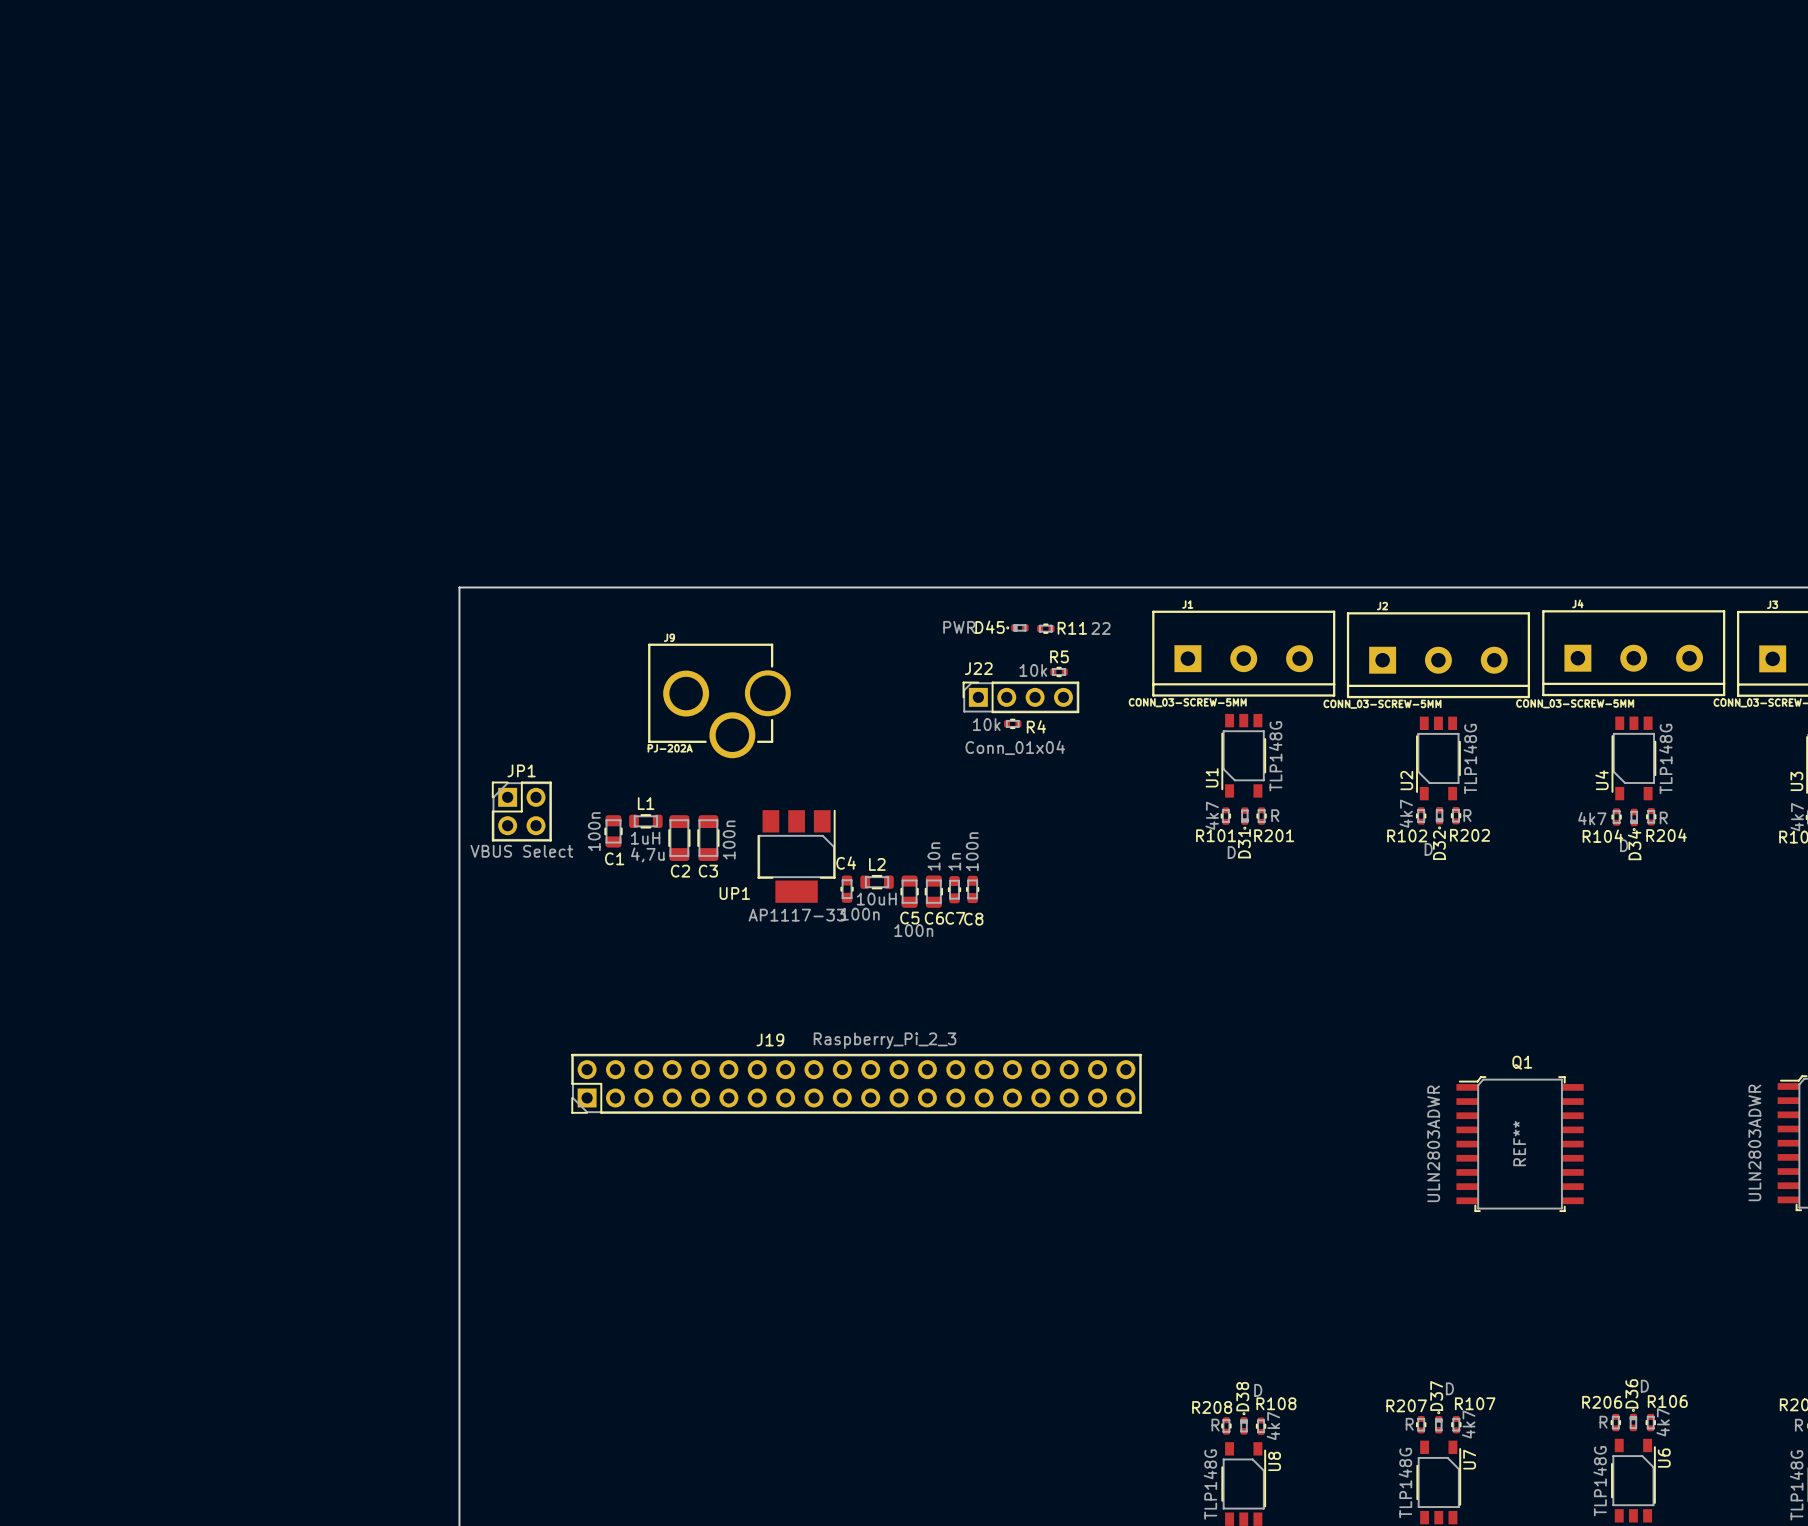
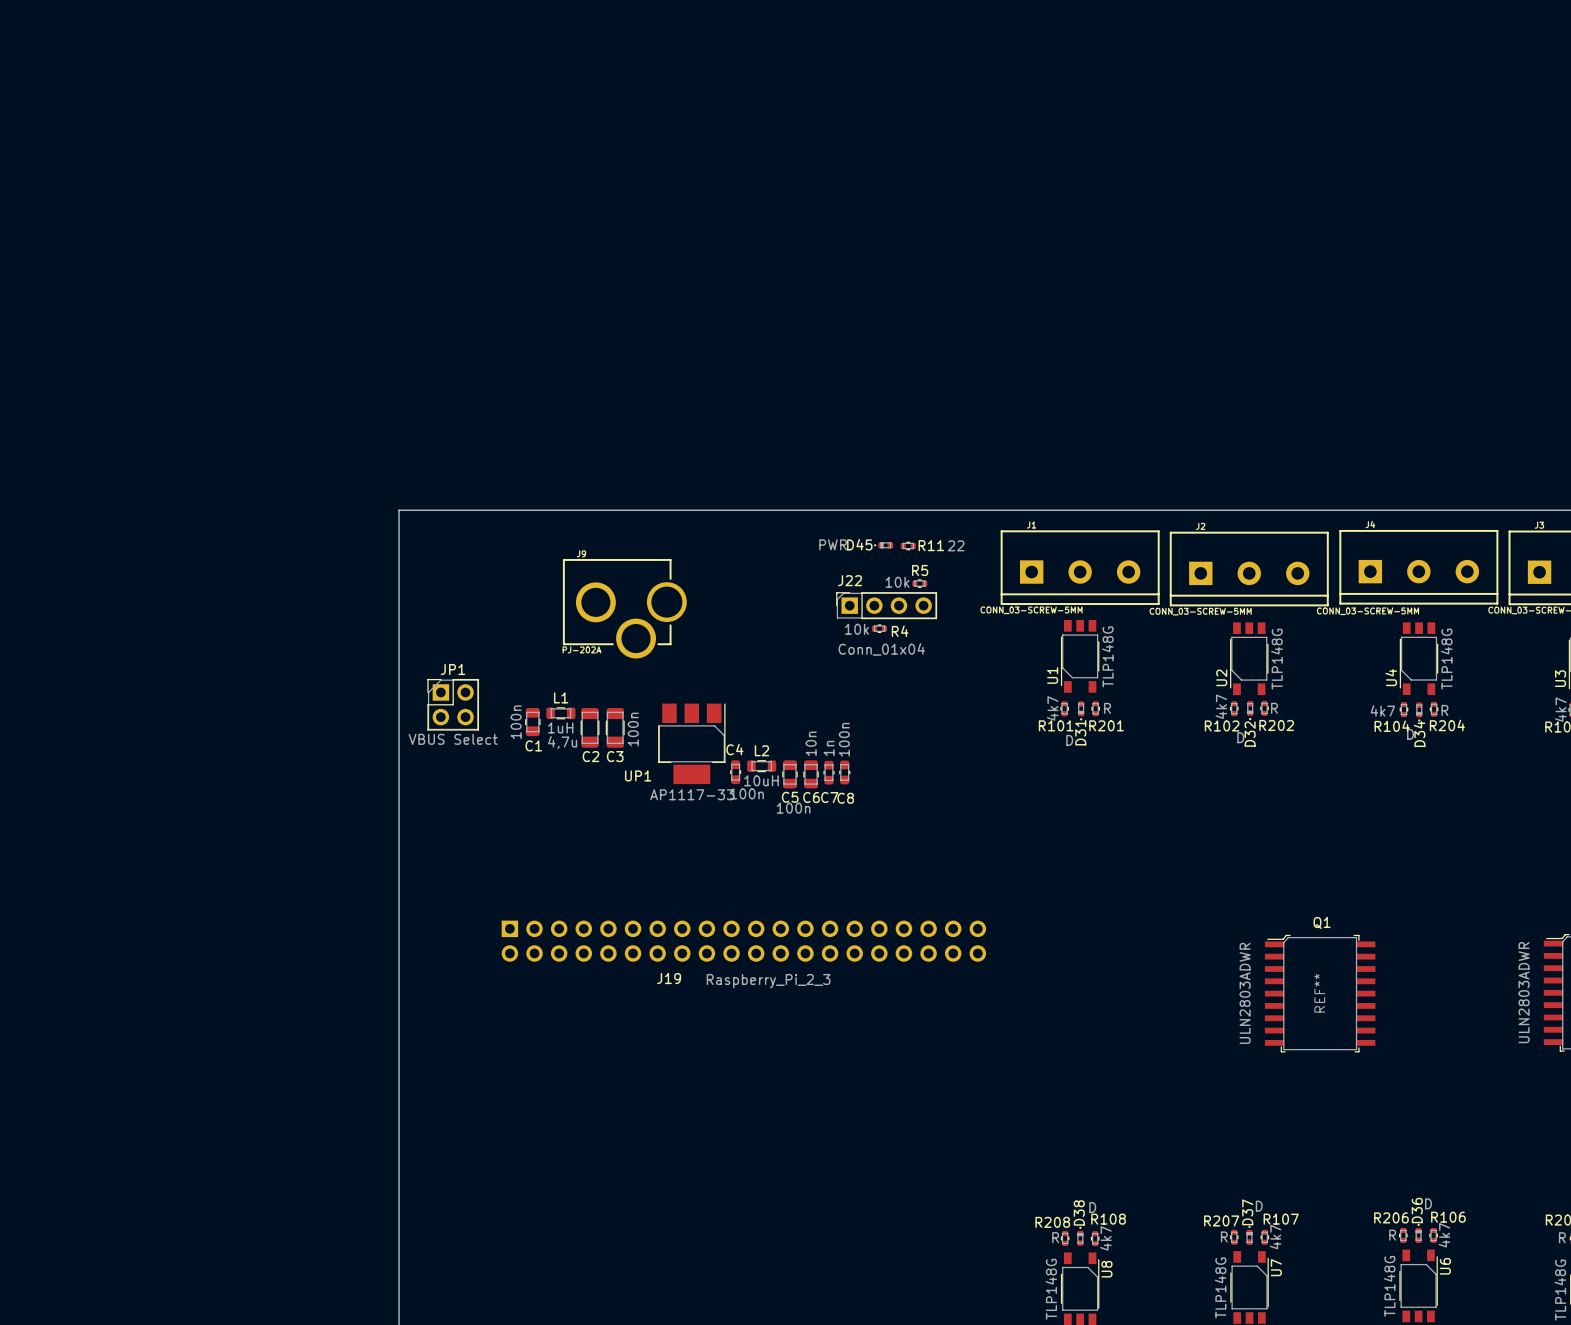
J19 side: top (856, 1083) -> bottom (743, 941)

